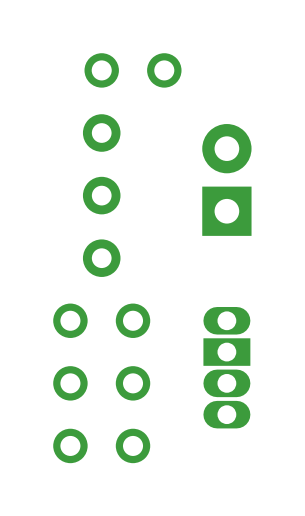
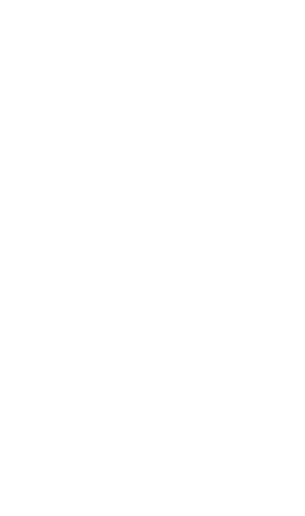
part: (133, 70) -> none
part: (226, 179) -> none
part: (101, 195) -> none
part: (101, 320) -> none
part: (226, 367) -> none
part: (101, 383) -> none
part: (101, 445) -> none

